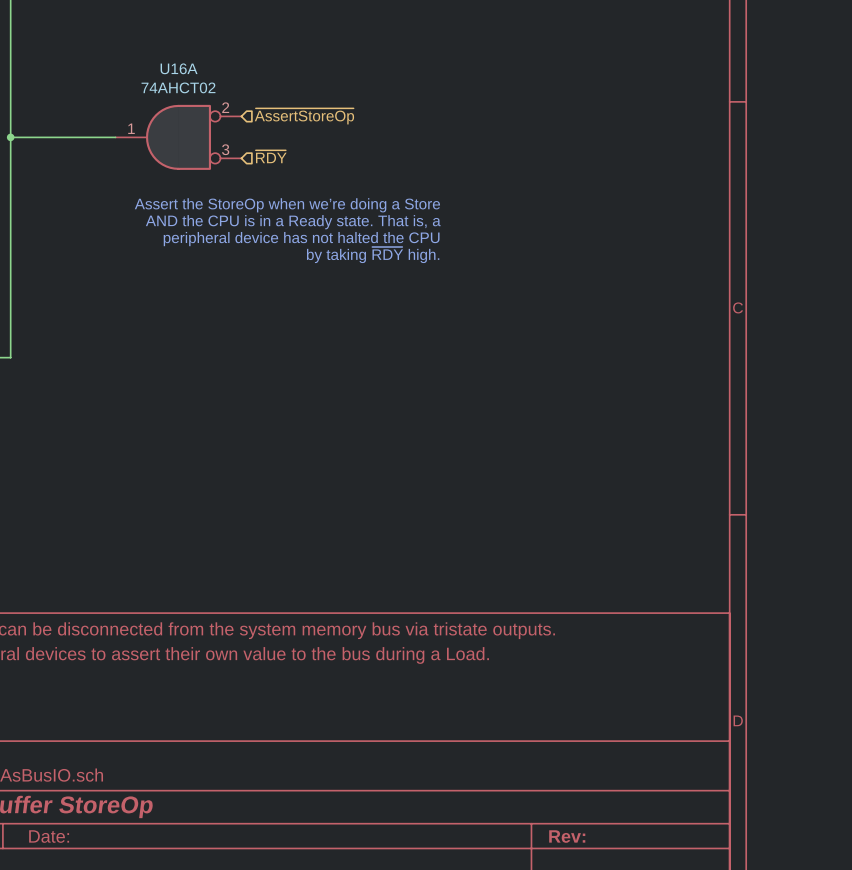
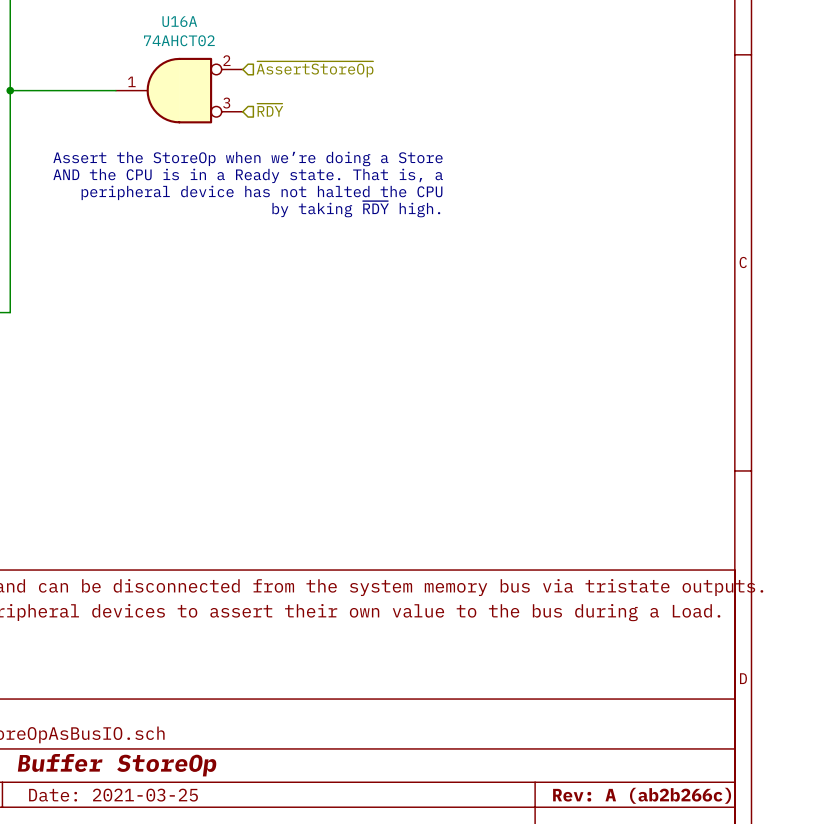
title block: Date: (49, 836) -> Date: 2021-03-25 (113, 795)
title block: Rev: (567, 836) -> Rev: A (ab2b266c) (642, 795)

